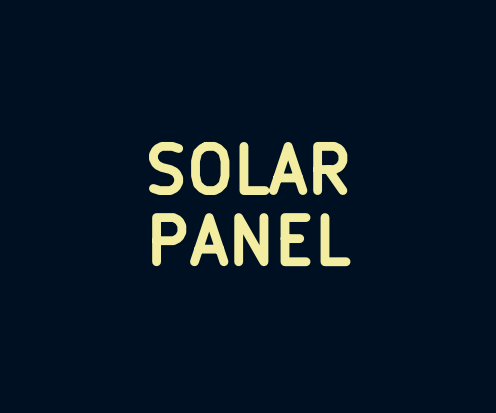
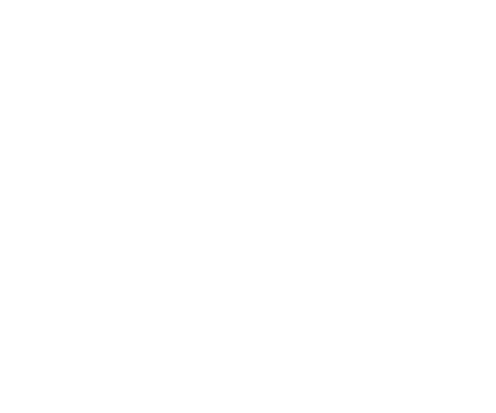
text: SOLAR (248, 168) -> none
text: PANEL (251, 239) -> none

